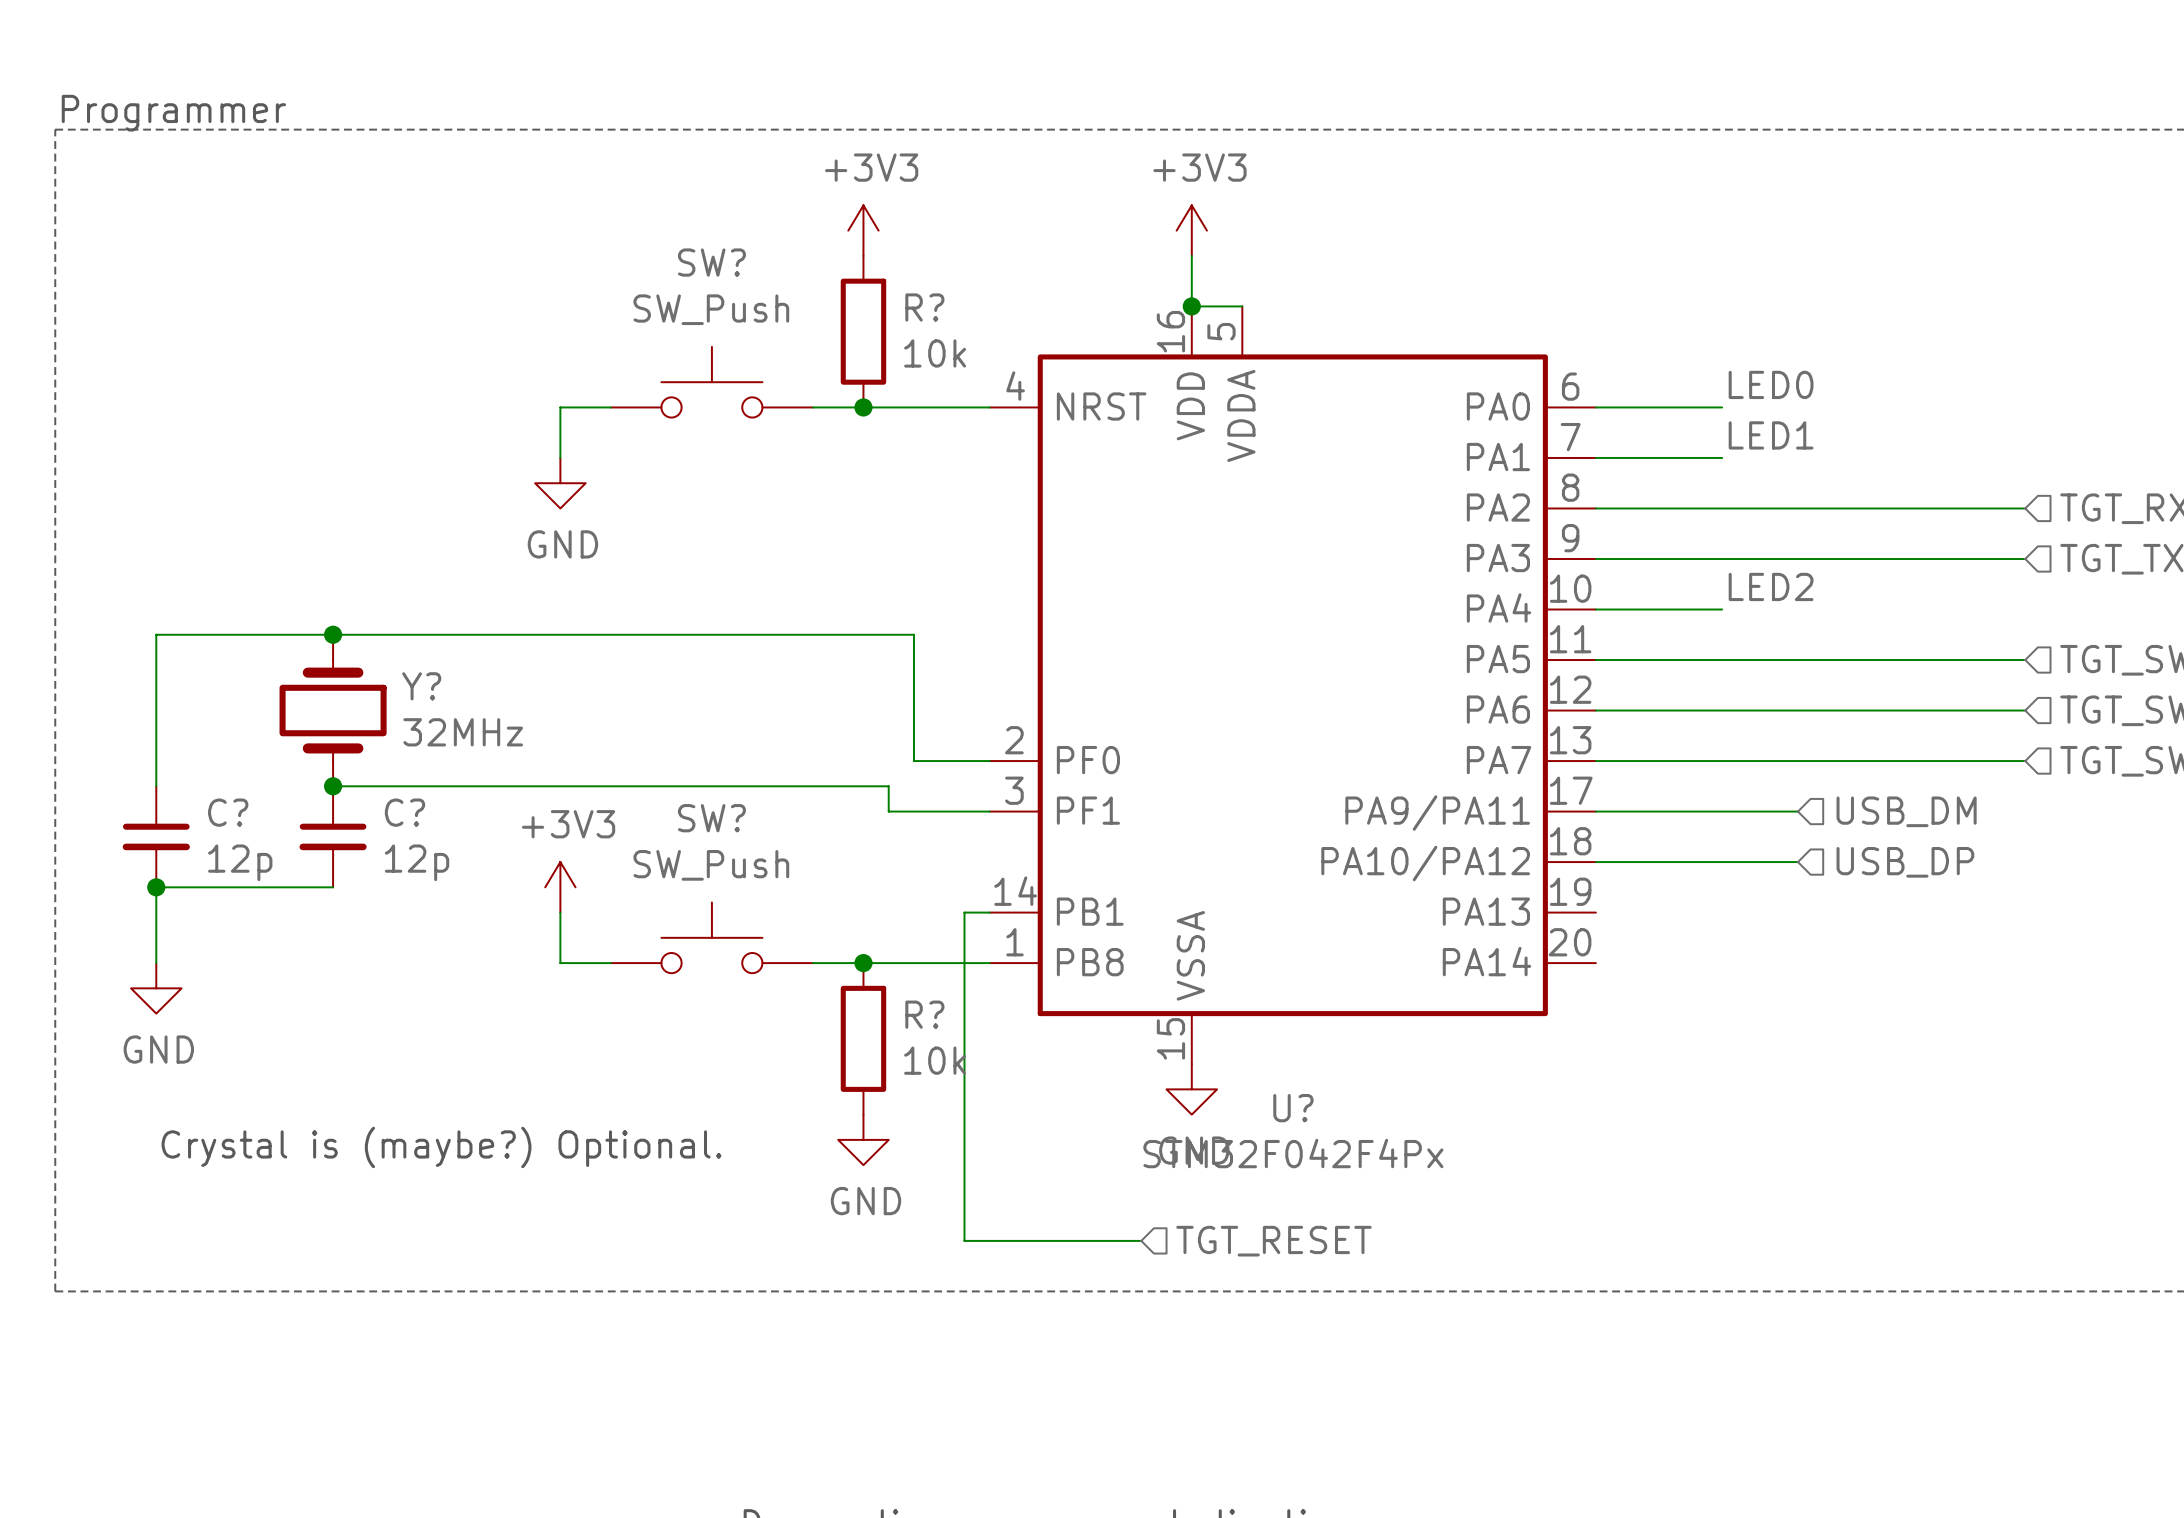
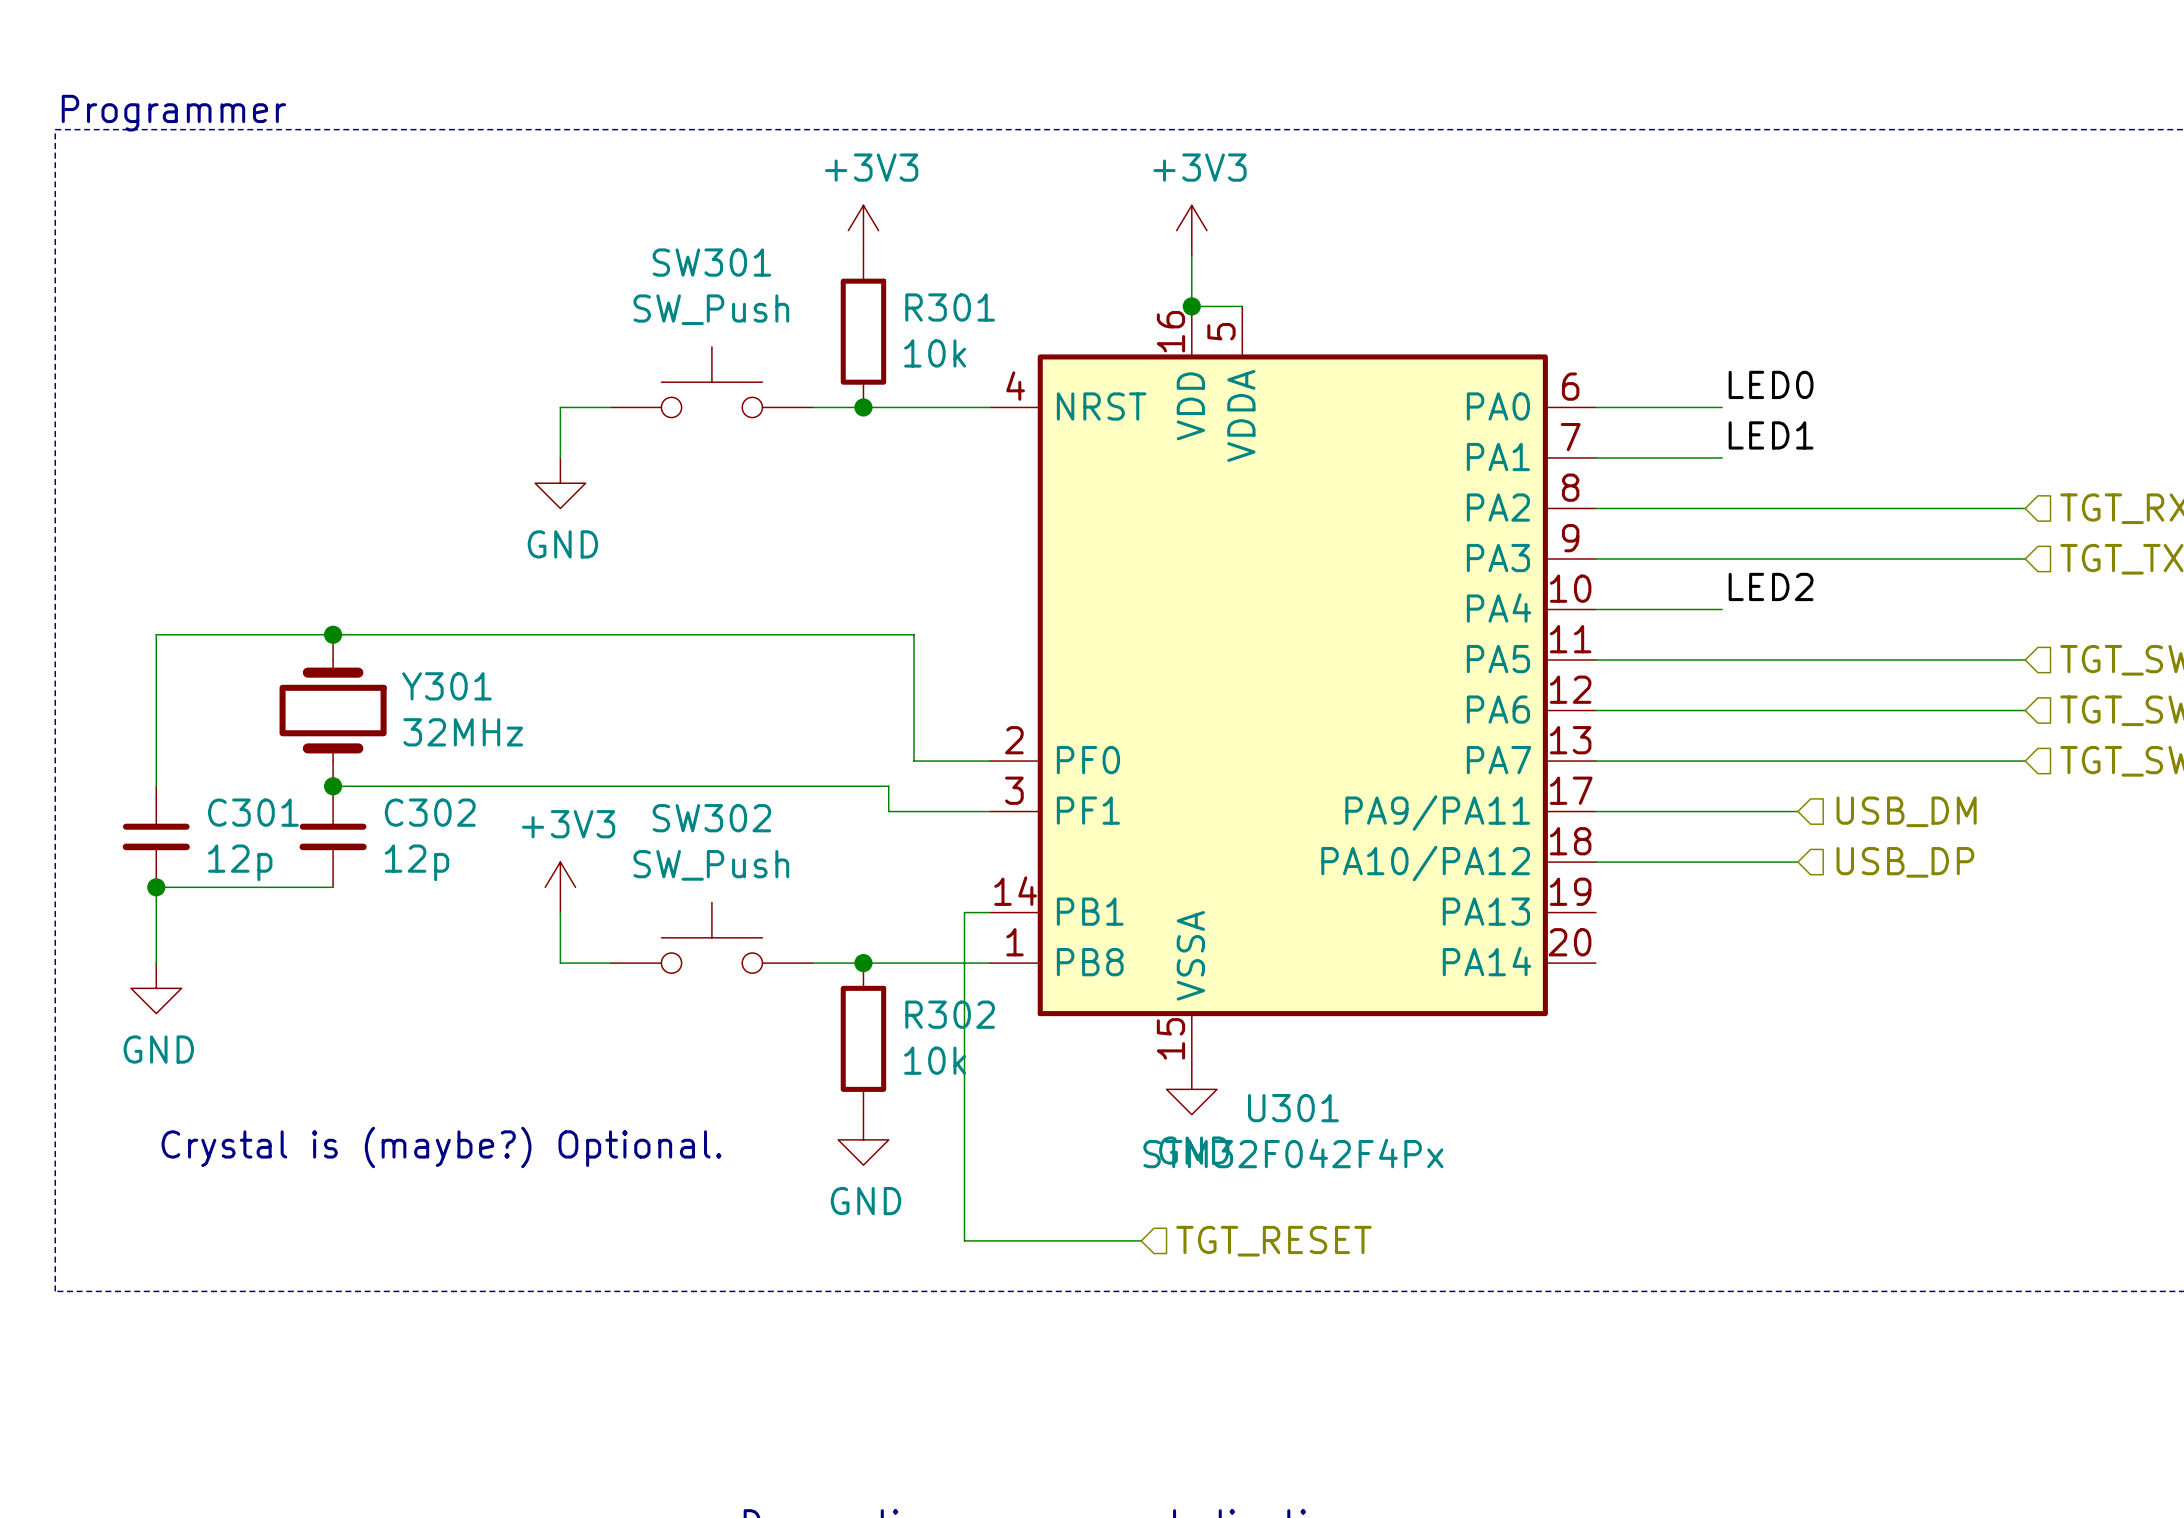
SW? name: SW? (711, 262) -> SW301 (711, 262)
R? name: R? (924, 307) -> R301 (950, 307)
Y? name: Y? (421, 686) -> Y301 (446, 686)
C? name: C? (228, 812) -> C301 (253, 812)
C? name: C? (405, 812) -> C302 (430, 812)
SW? name: SW? (711, 818) -> SW302 (711, 818)
R? name: R? (924, 1014) -> R302 (950, 1014)
U? name: U? (1293, 1108) -> U301 (1293, 1108)

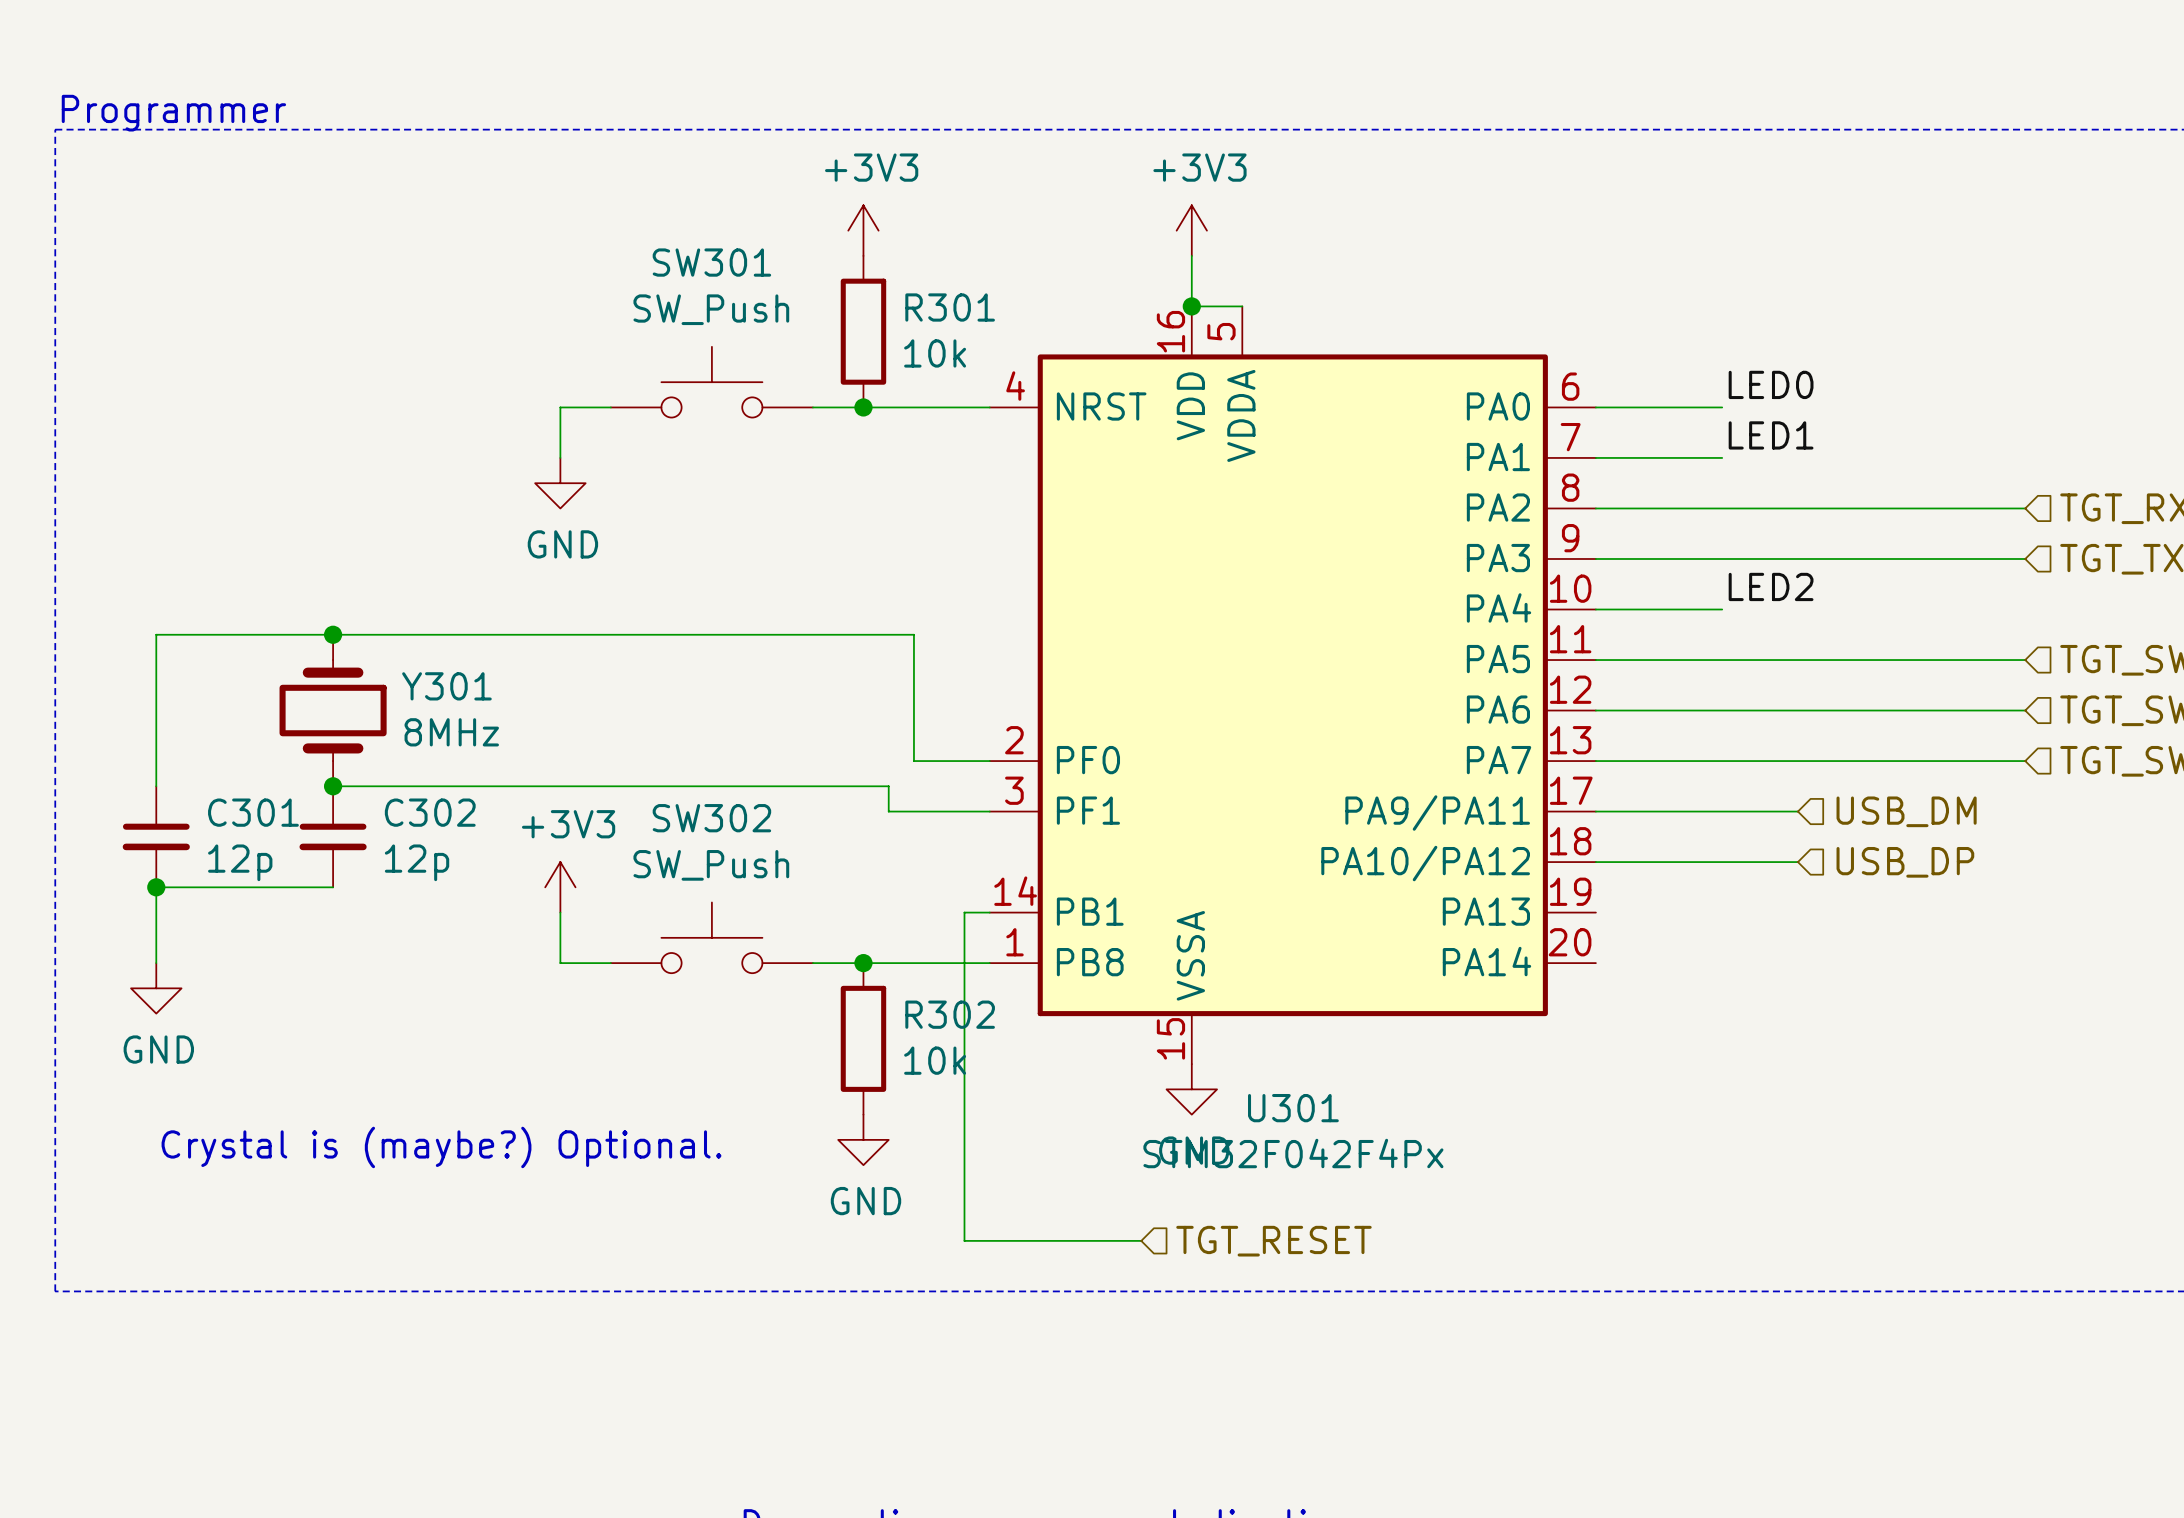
Y301 value: 32MHz (463, 732) -> 8MHz (451, 732)

